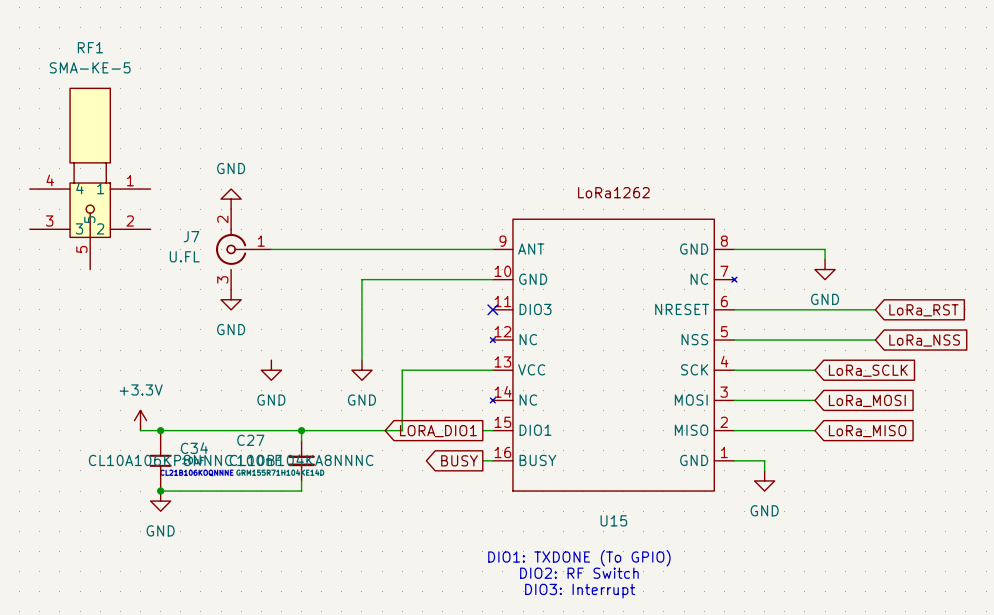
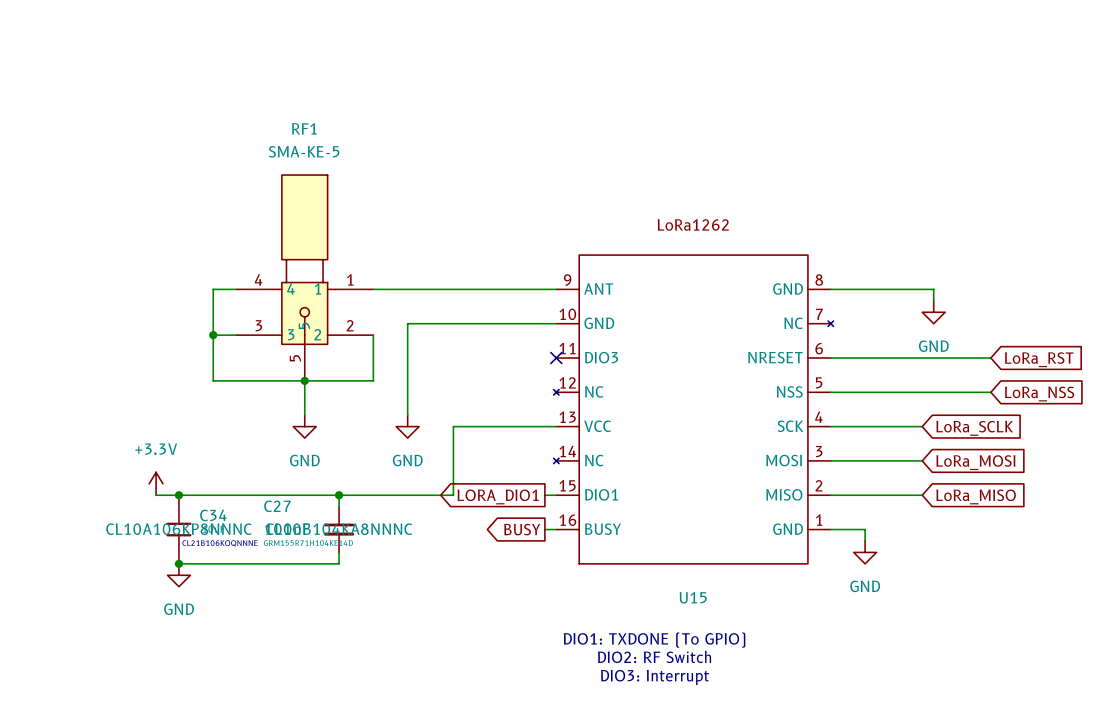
RF1 position: (90, 178) -> (304, 277)
power symbol: GND (231, 199) -> none
wire: none -> (236, 289) (213, 289) (213, 380) (373, 380) (373, 335)
J7: U.FL (243, 249) -> none
wire: none -> (213, 335) (236, 335)
junction: none -> (213, 335)
power symbol: GND (231, 299) -> none
wire: none -> (304, 380) (304, 415)
junction: none -> (304, 380)

